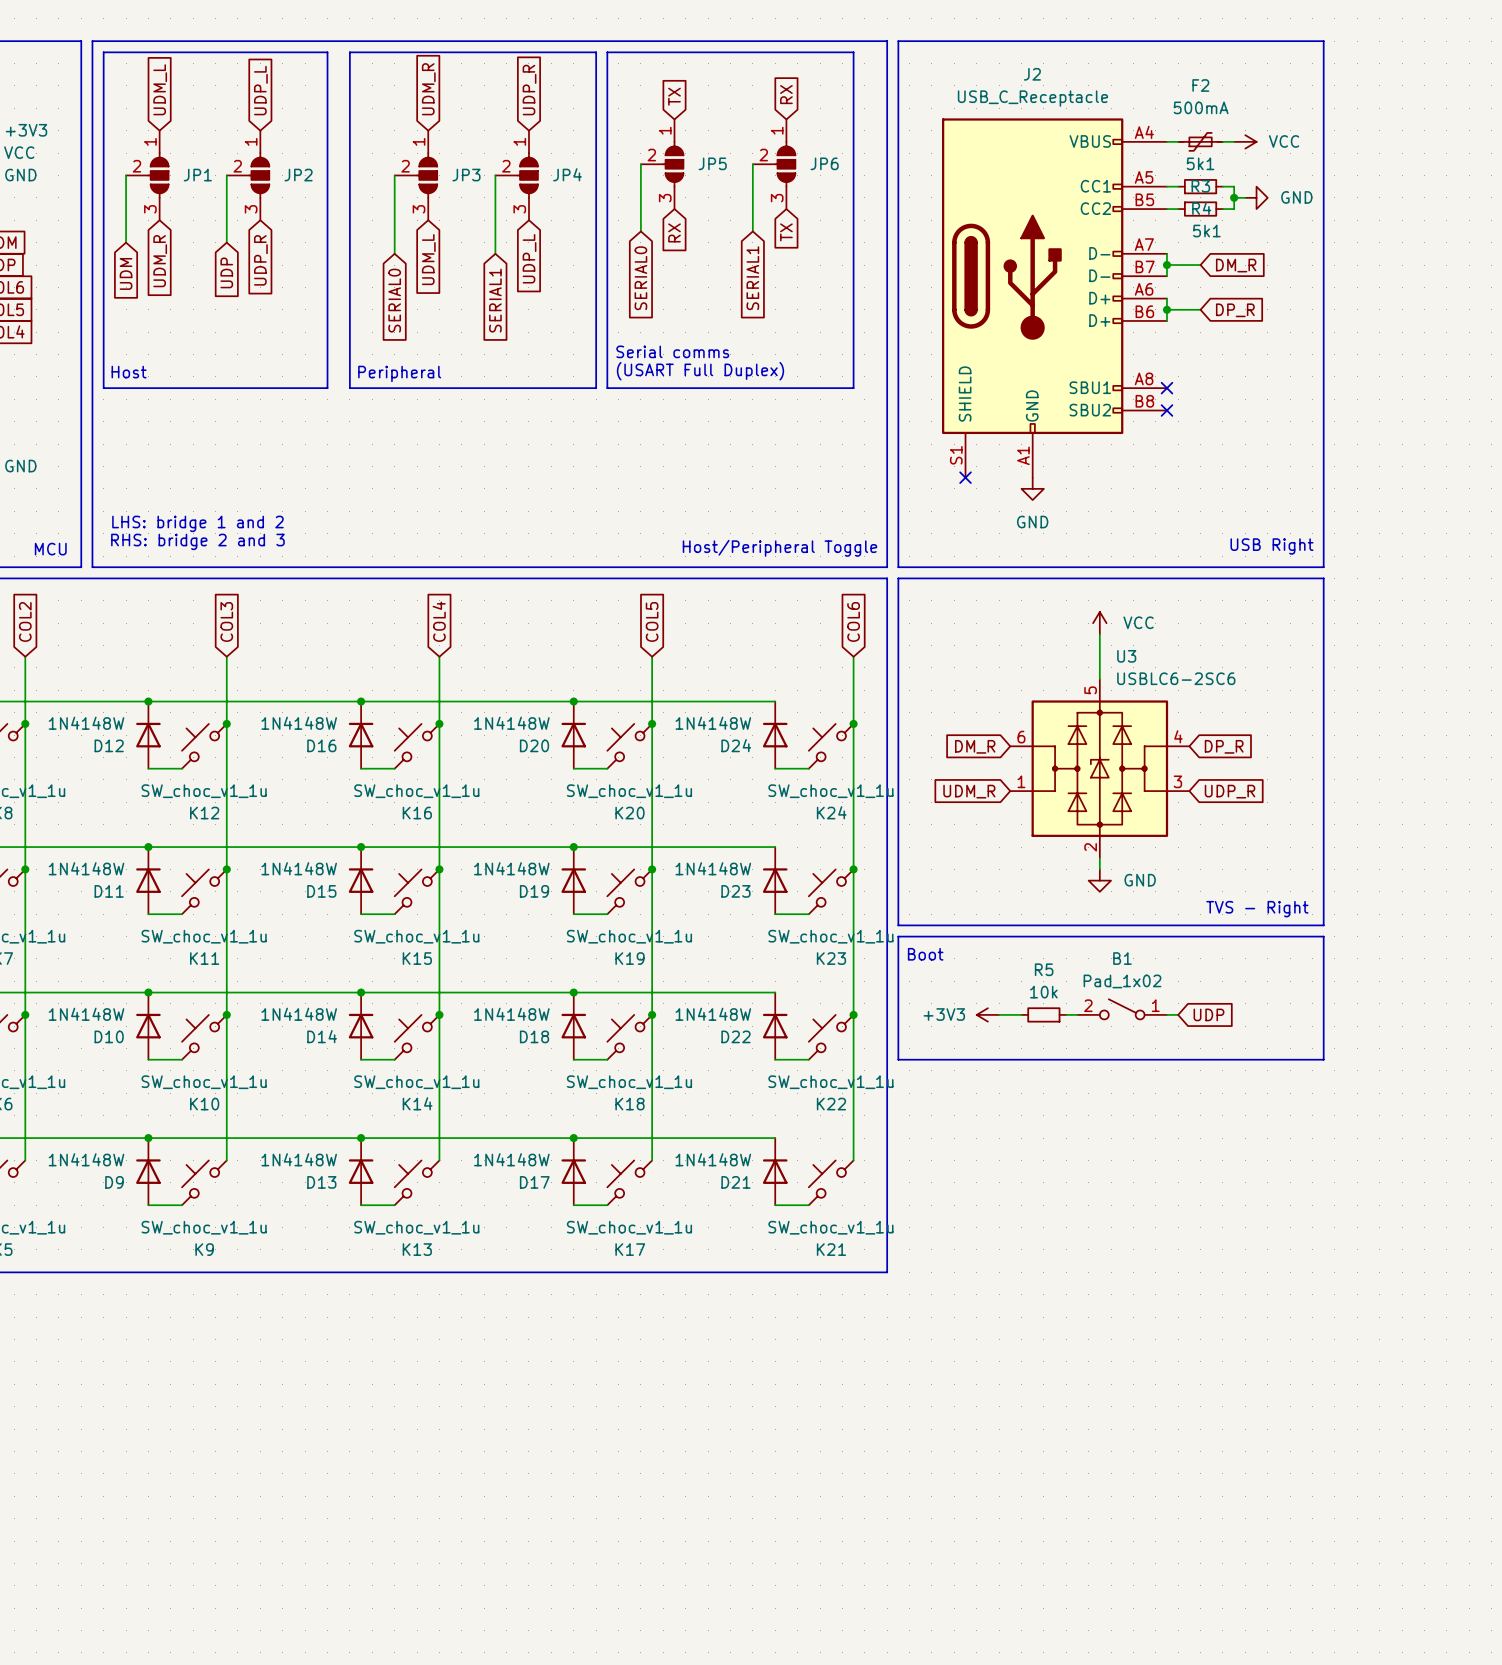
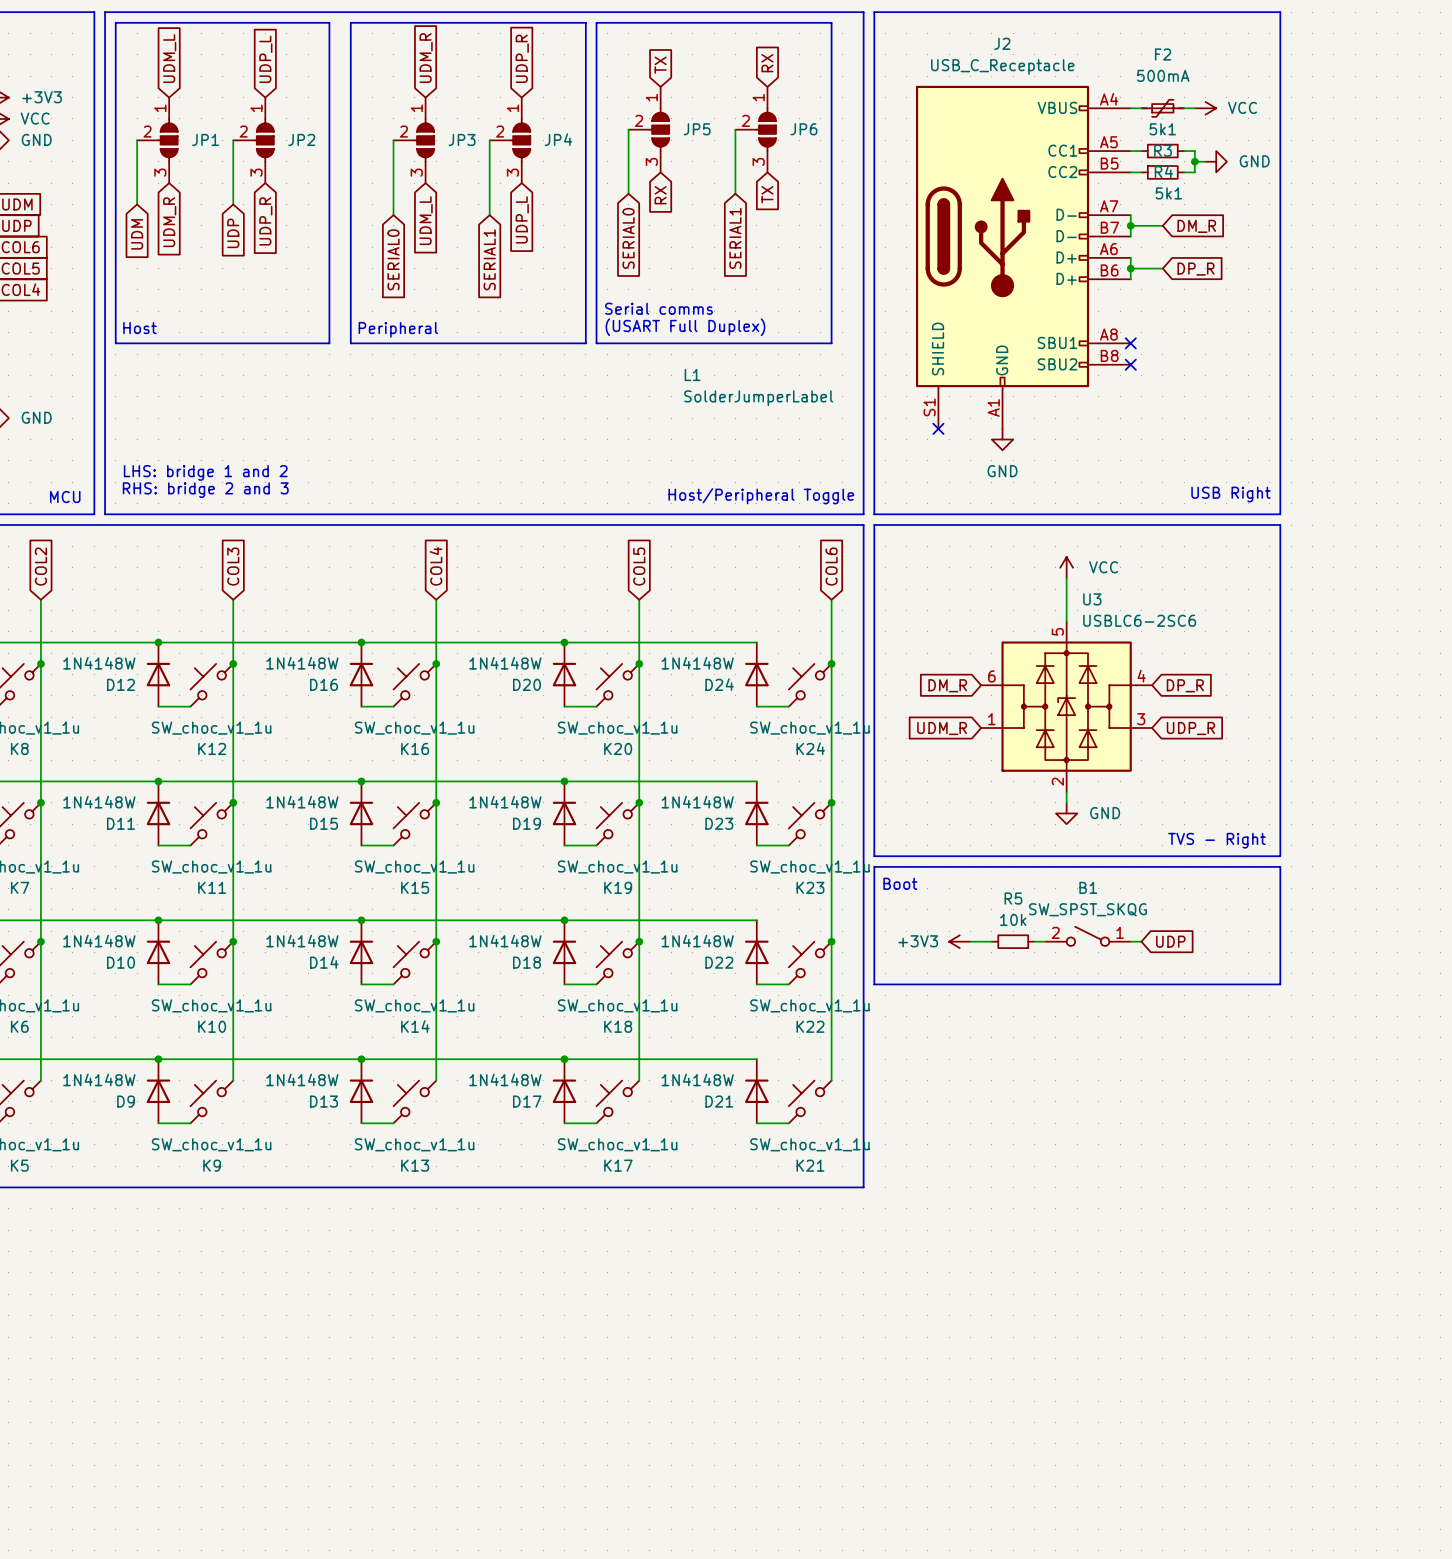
L1: none -> SolderJumperLabel (758, 387)
B1 value: Pad_1x02 (1122, 981) -> SW_SPST_SKQG (1088, 909)

